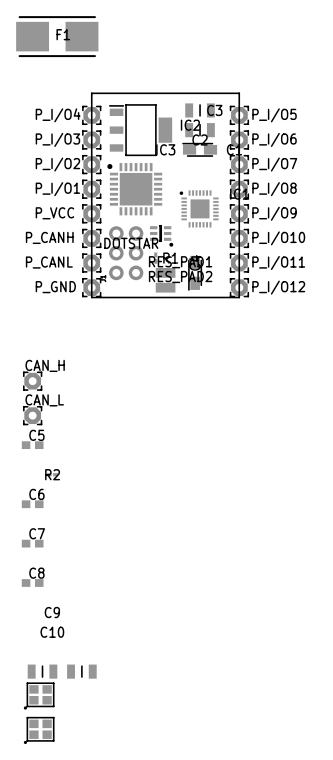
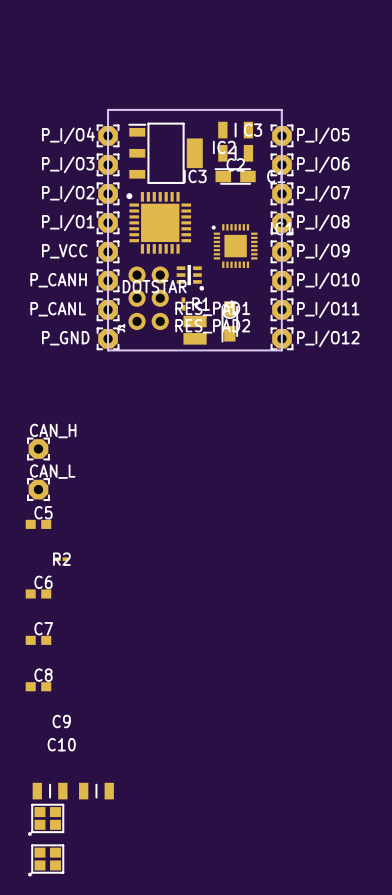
F1: (57, 36) -> none

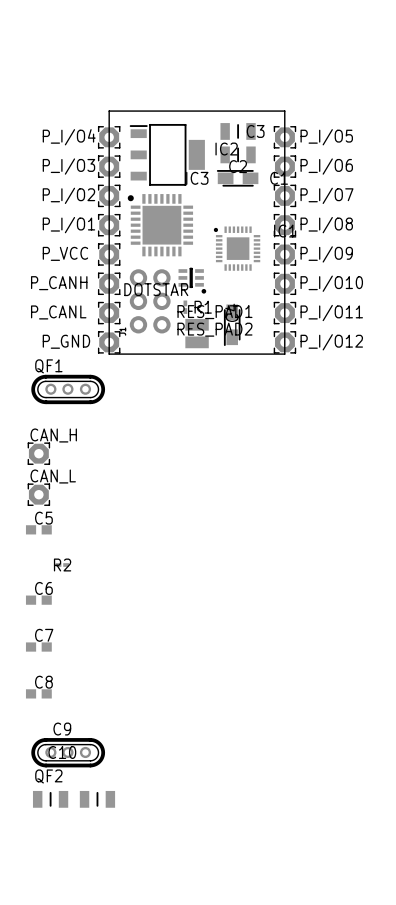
QF1: none -> (68, 389)
QF2: none -> (68, 752)
part: (46, 819) -> none
part: (46, 860) -> none

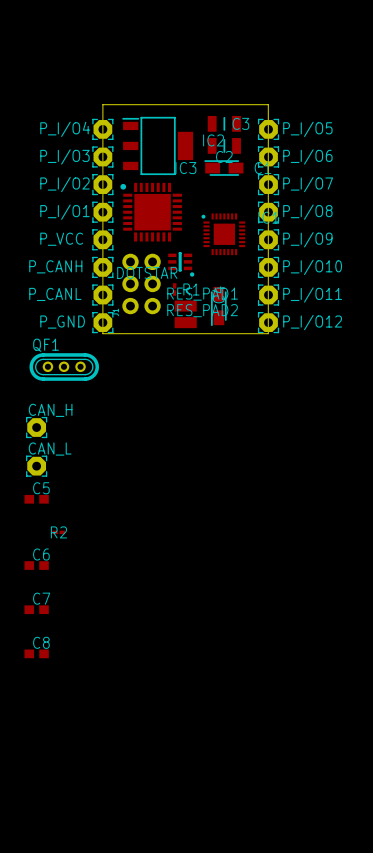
QF2: (68, 752) -> none
C9: (50, 799) -> none
C10: (97, 799) -> none

